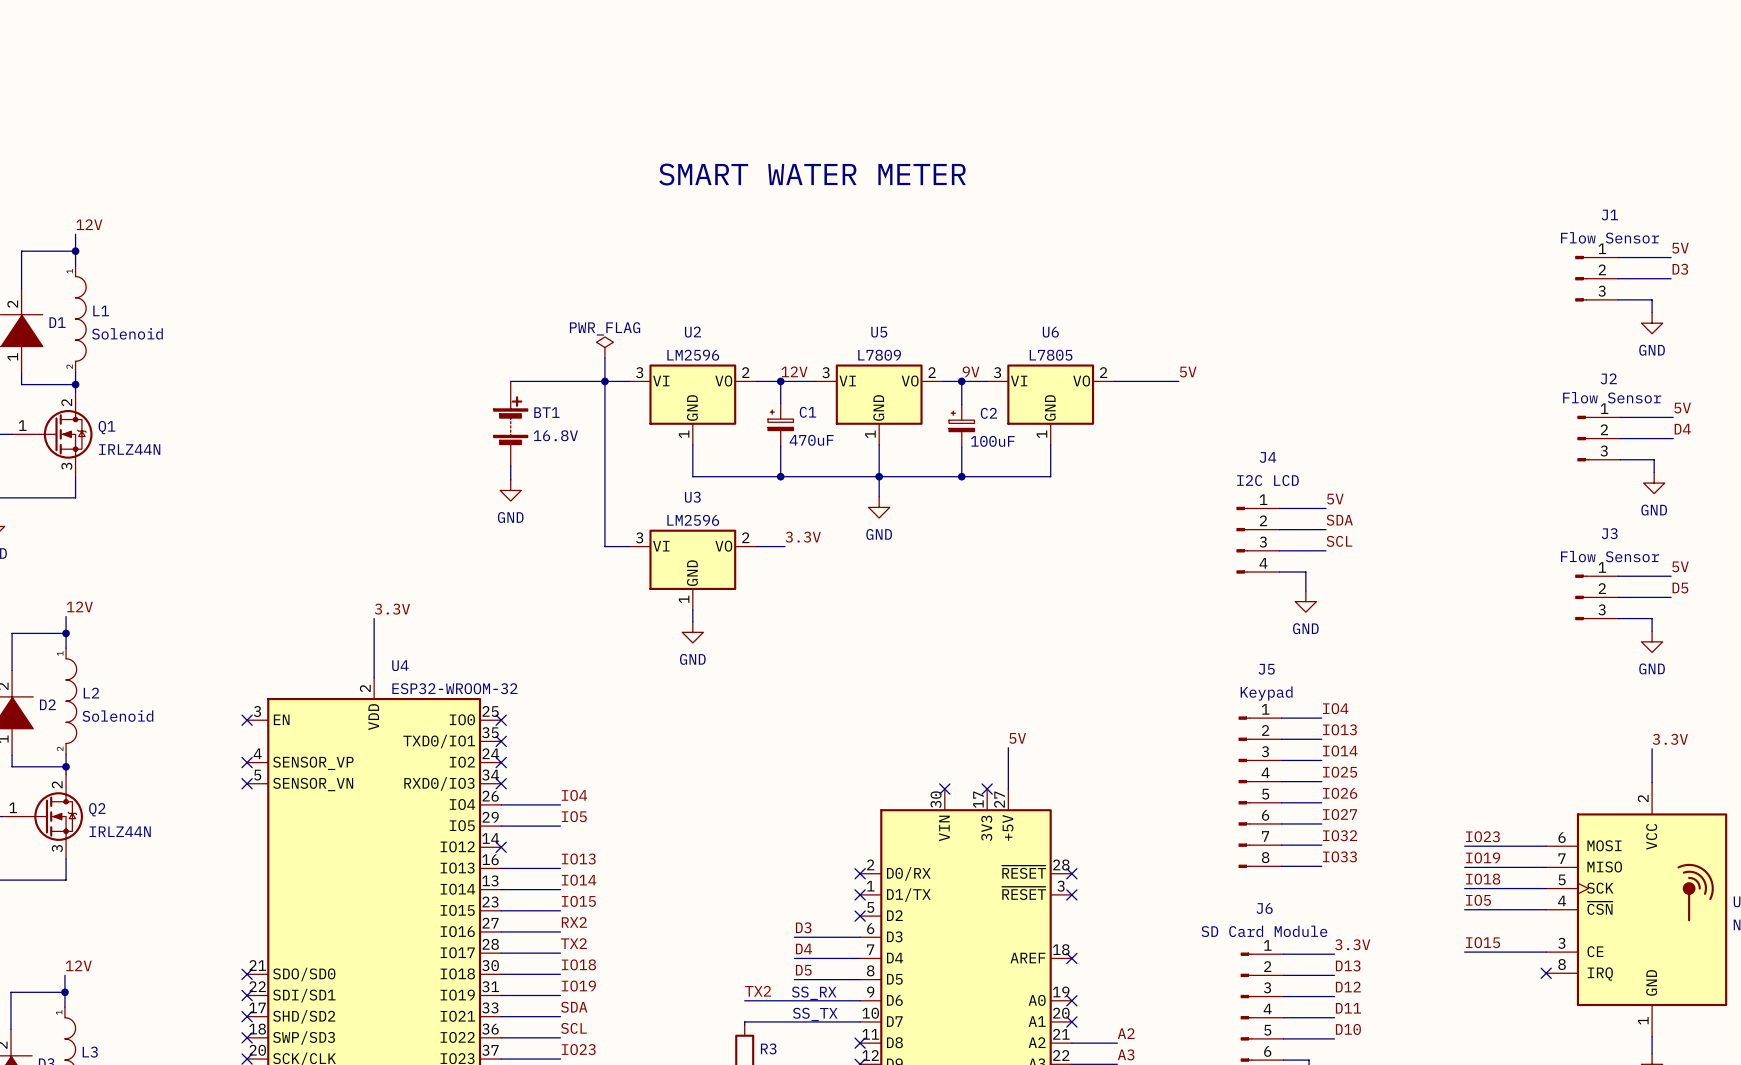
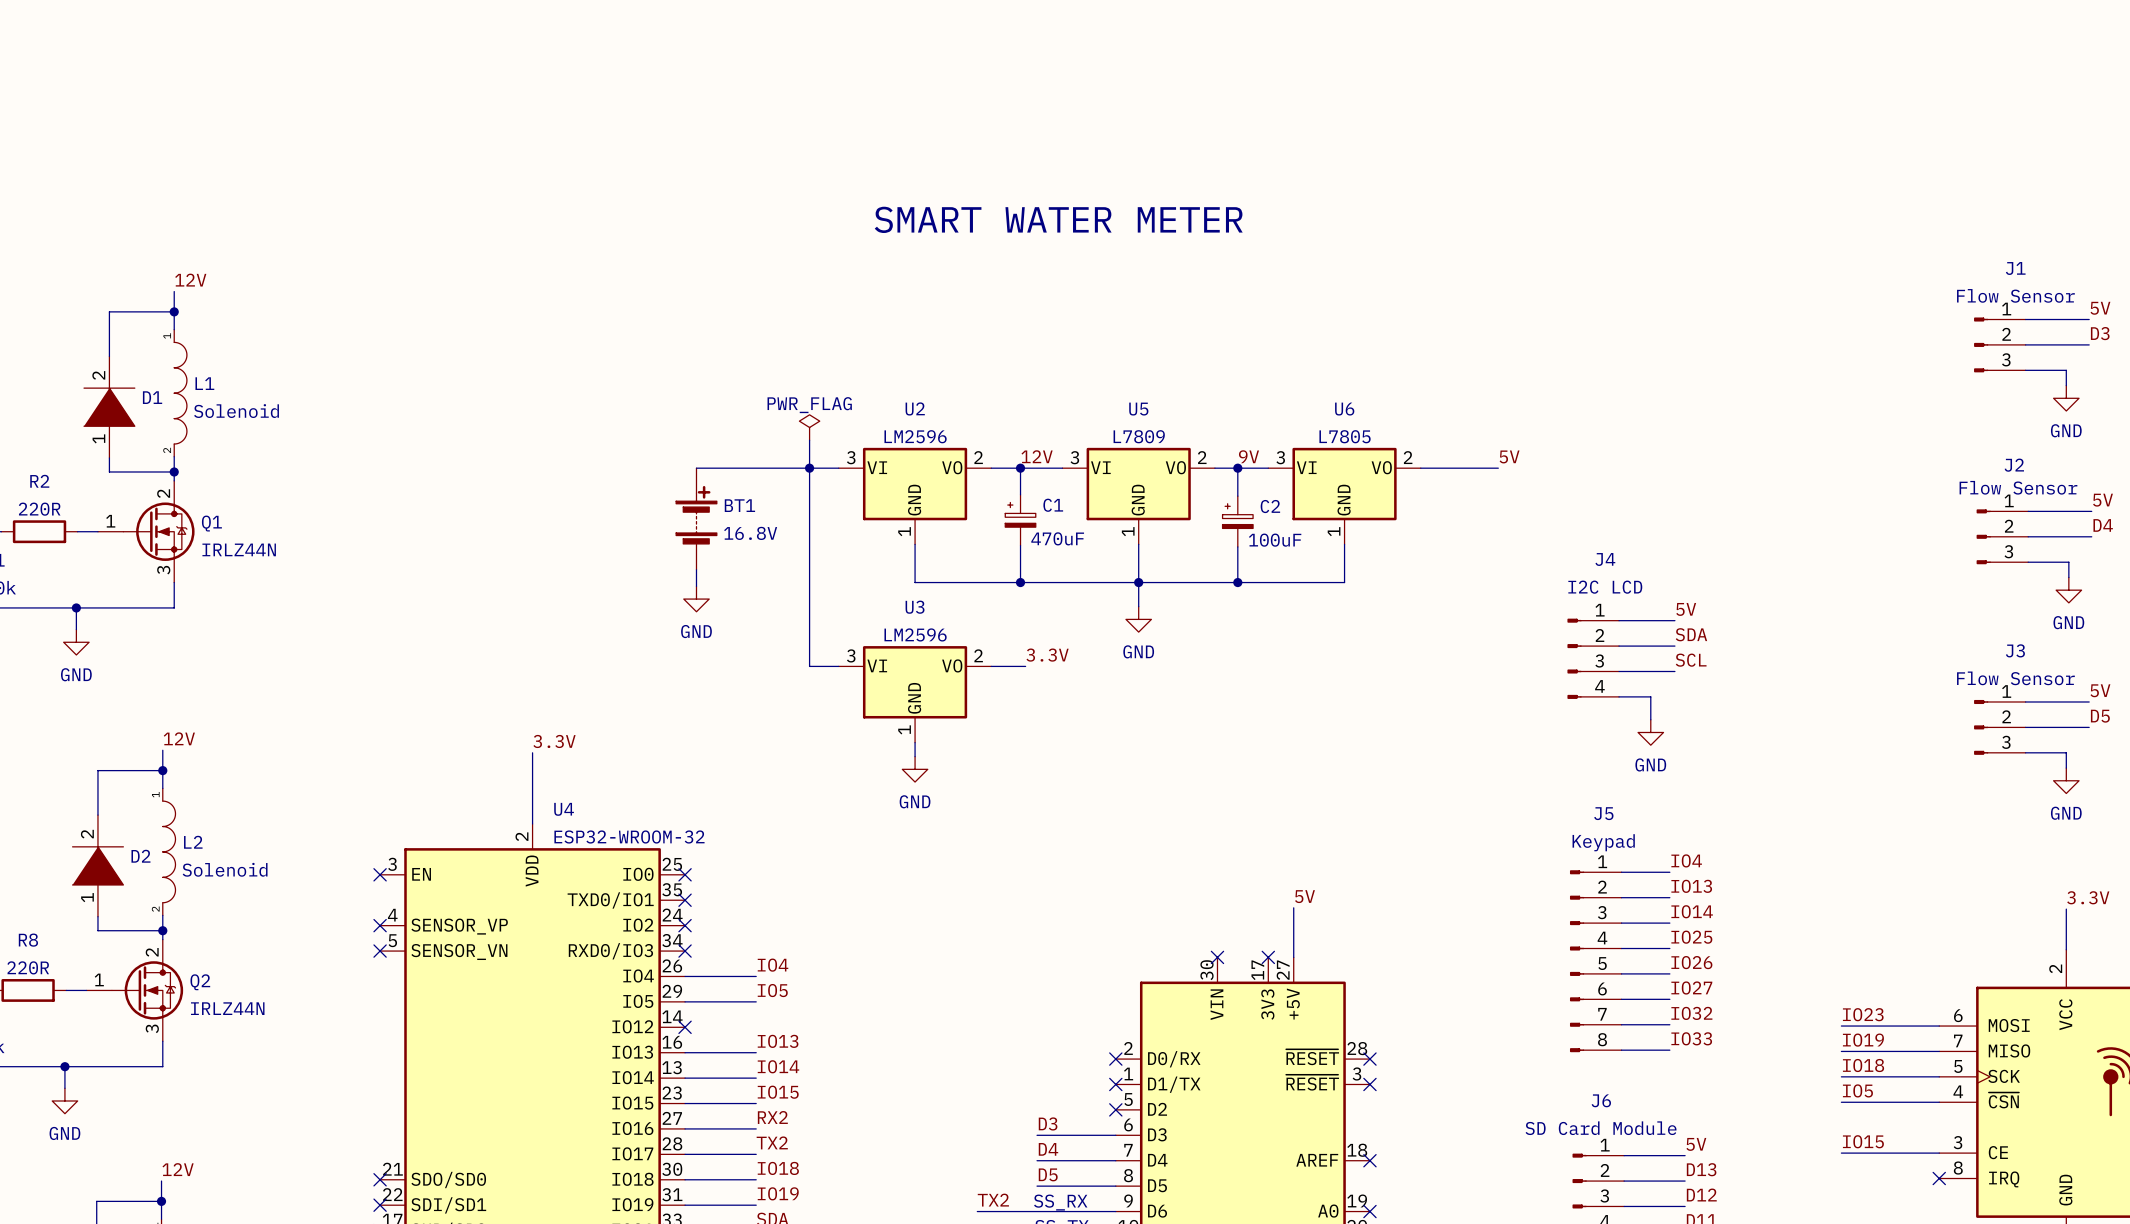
label: 3.3V (1352, 944) -> 5V (1696, 1144)

